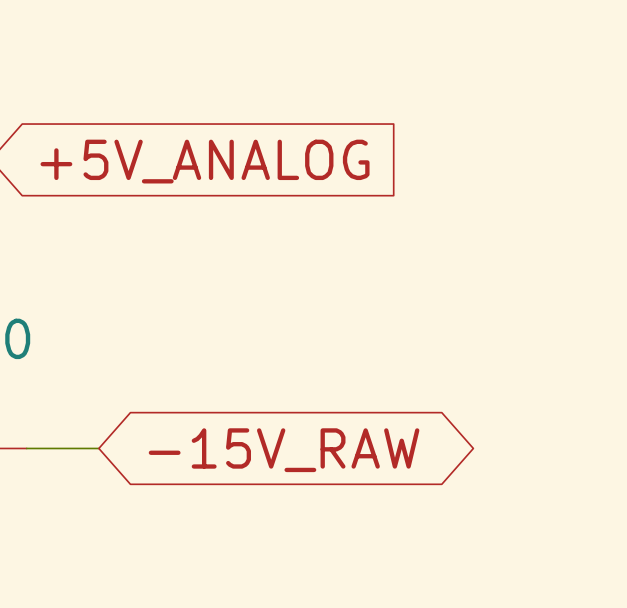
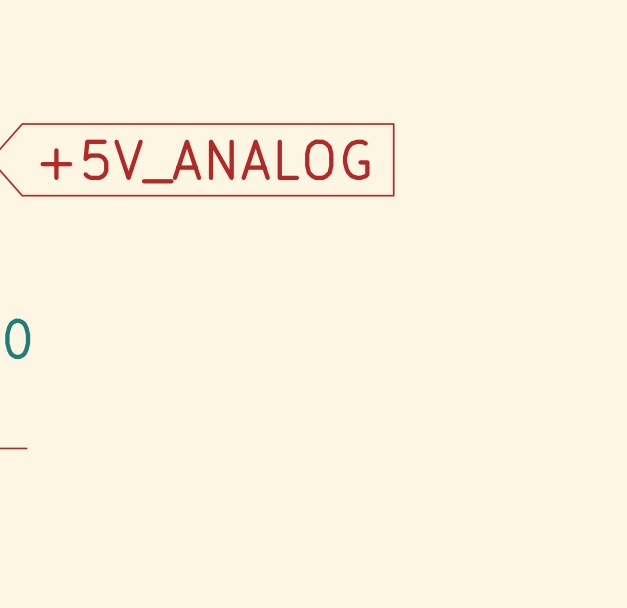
wire: (26, 448) (98, 448) -> none
global label: -15V_RAW (284, 450) -> none

